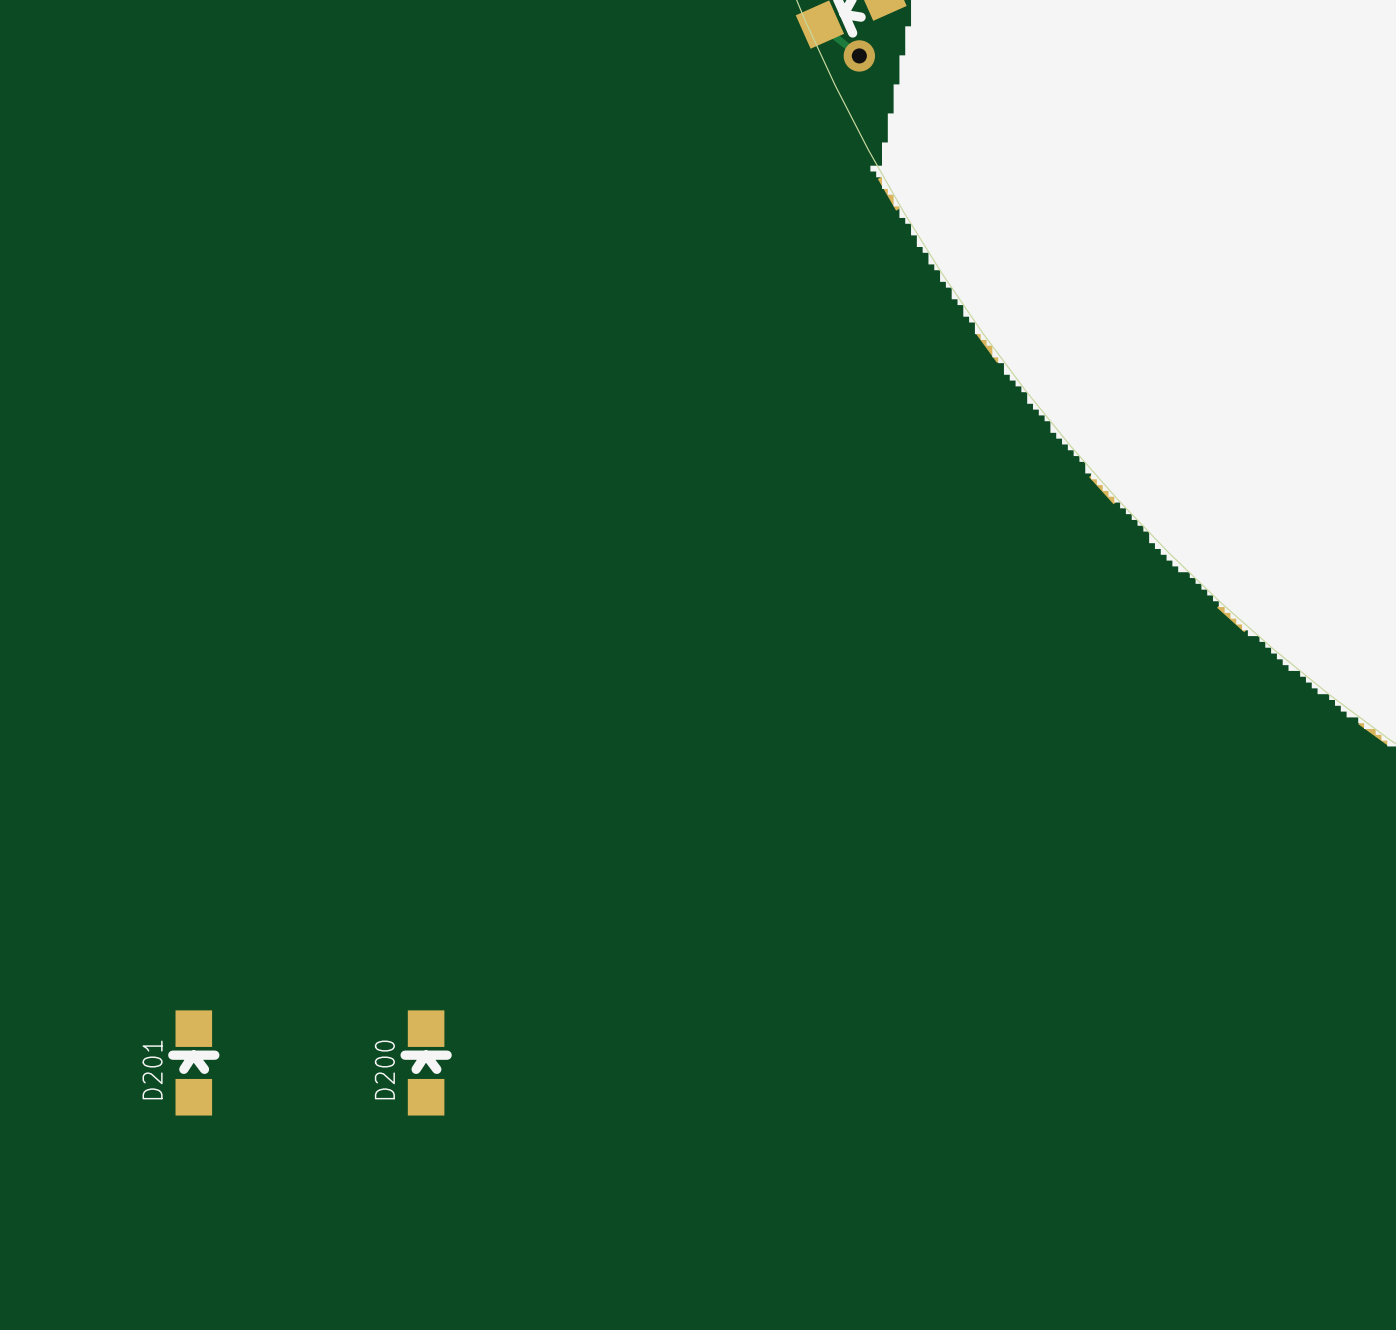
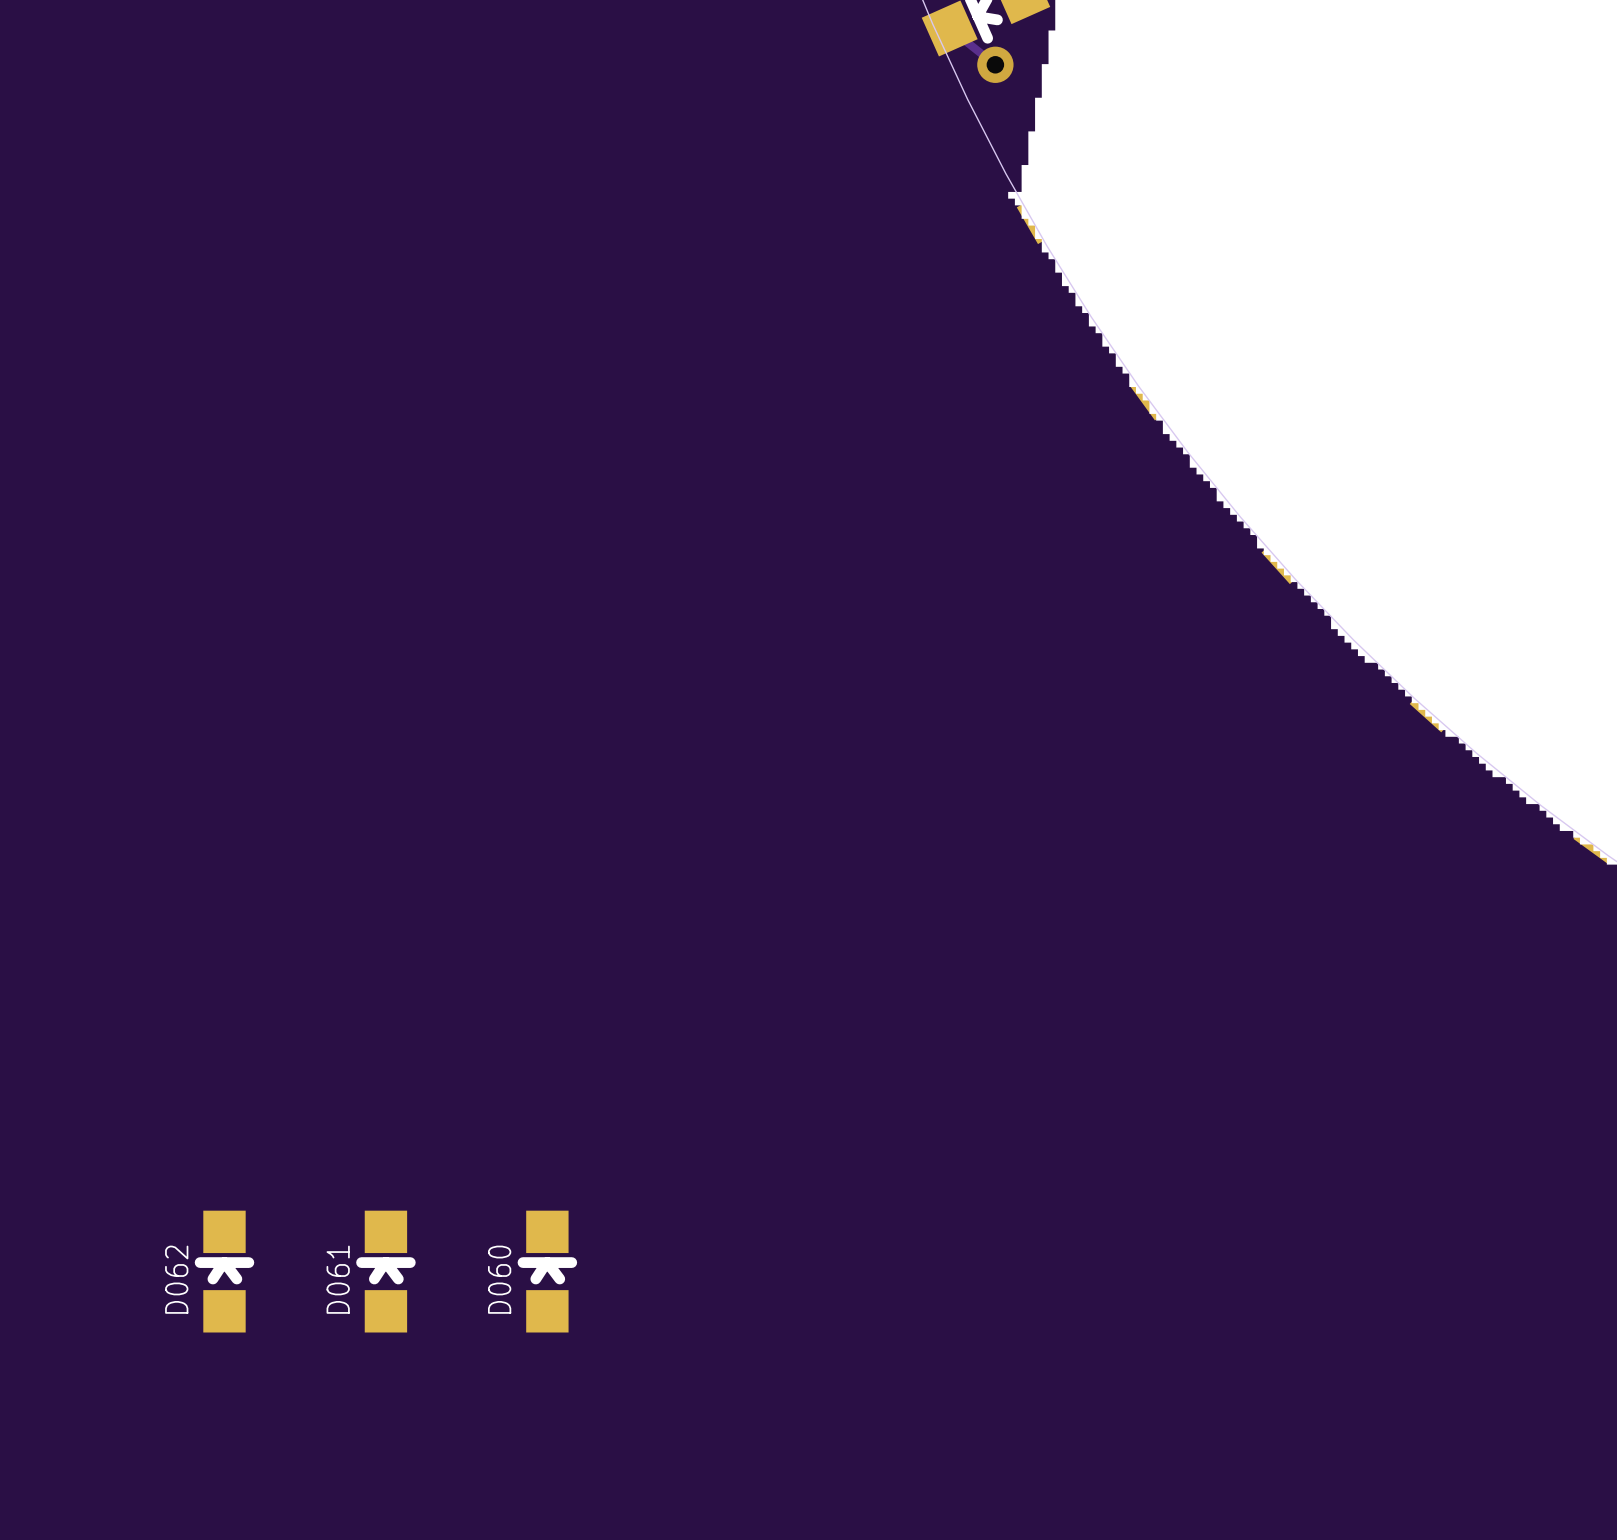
D201 position: (193, 1062) -> (224, 1271)
D200: (426, 1062) -> none
D201 name: D201 (152, 1069) -> D062 (176, 1279)
D061: none -> (385, 1271)
D060: none -> (547, 1271)

